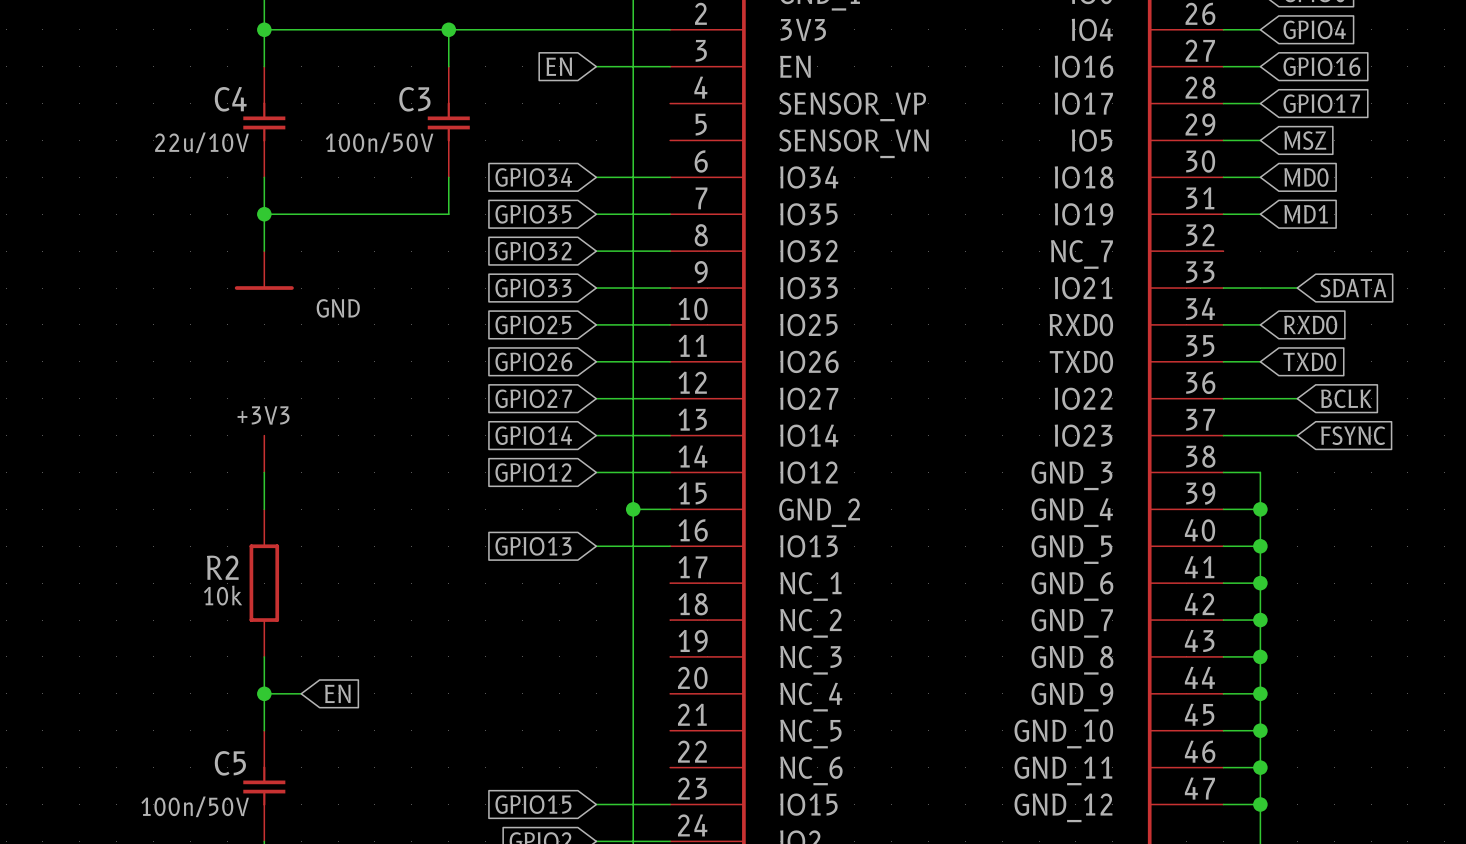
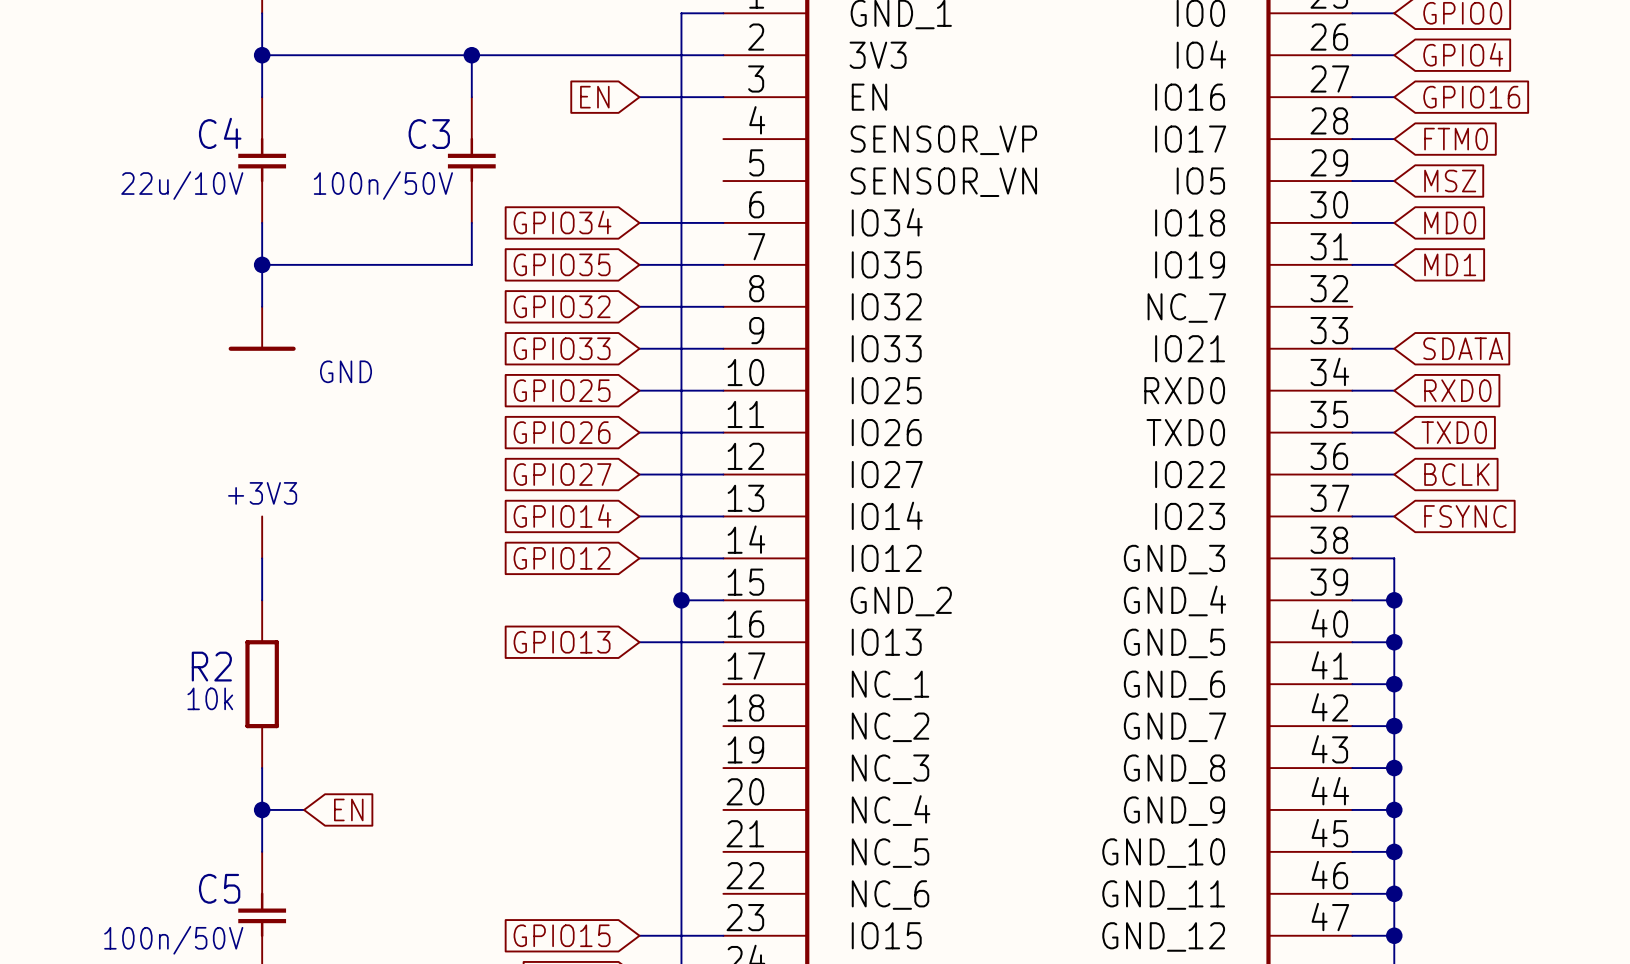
global label: GPIO17 (1321, 103) -> FTM0 (1456, 139)
wire: (1260, 288) (1297, 288) -> none
global label position: SDATA (1353, 288) -> SDATA (1463, 348)
wire: (1260, 398) (1297, 398) -> none
global label position: BCLK (1346, 398) -> BCLK (1456, 474)
wire: (1260, 435) (1297, 435) -> none
global label position: FSYNC (1353, 435) -> FSYNC (1465, 516)

